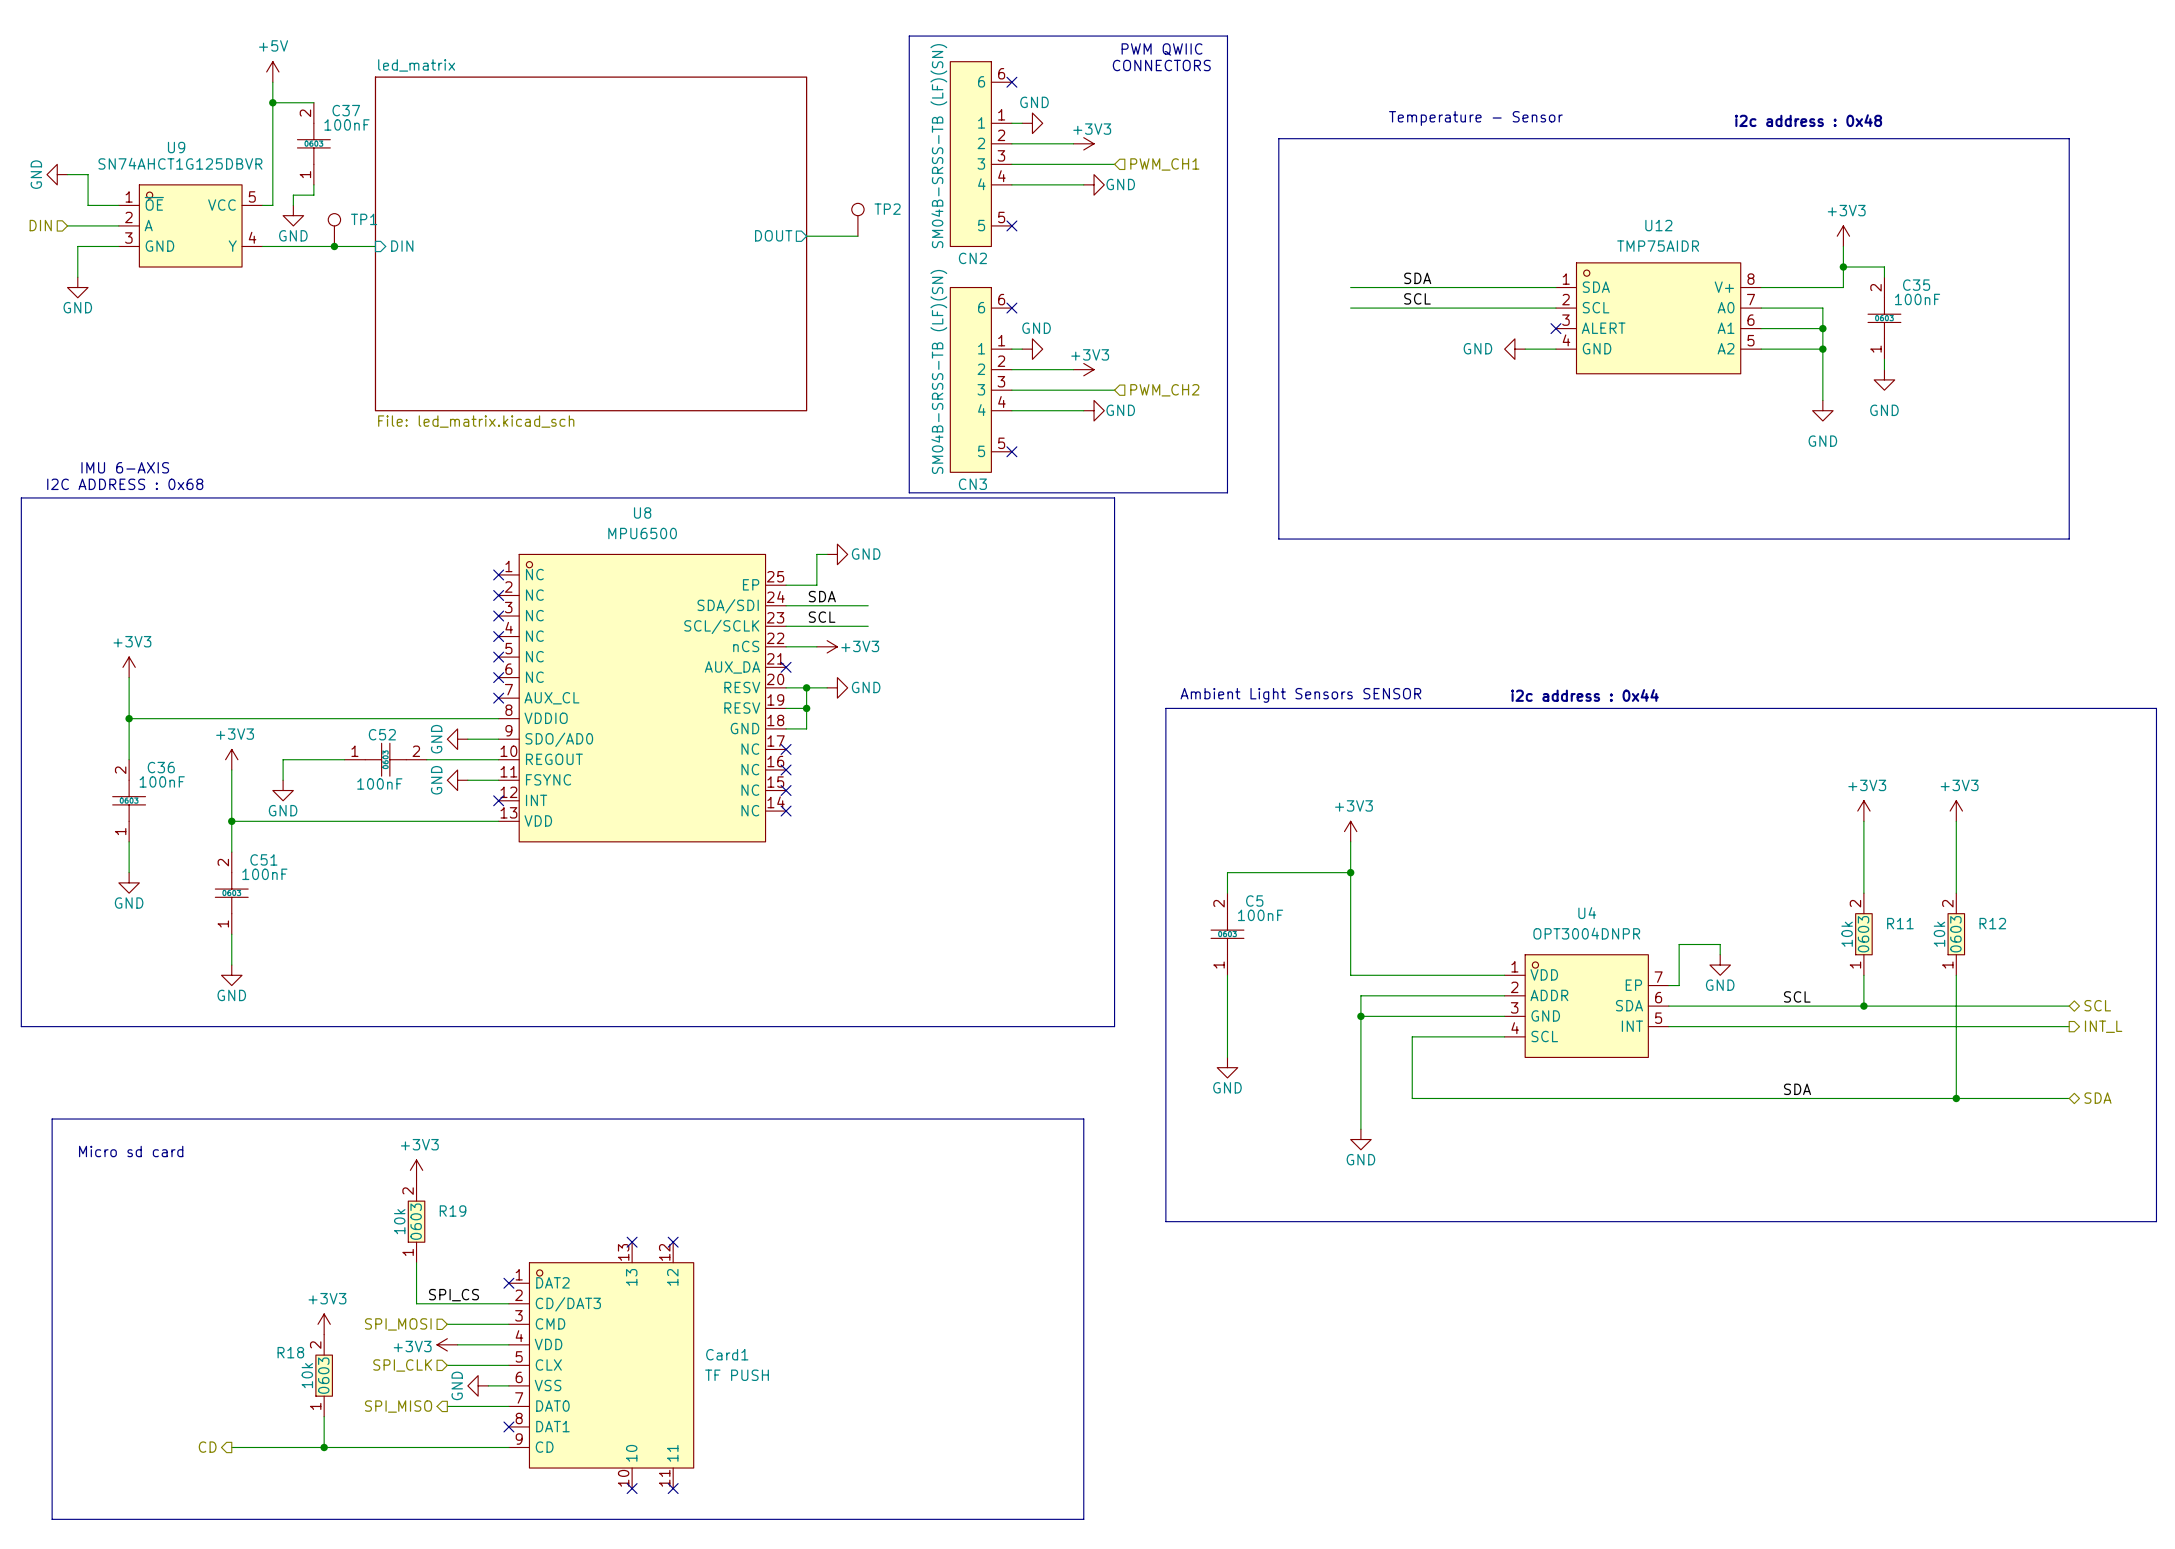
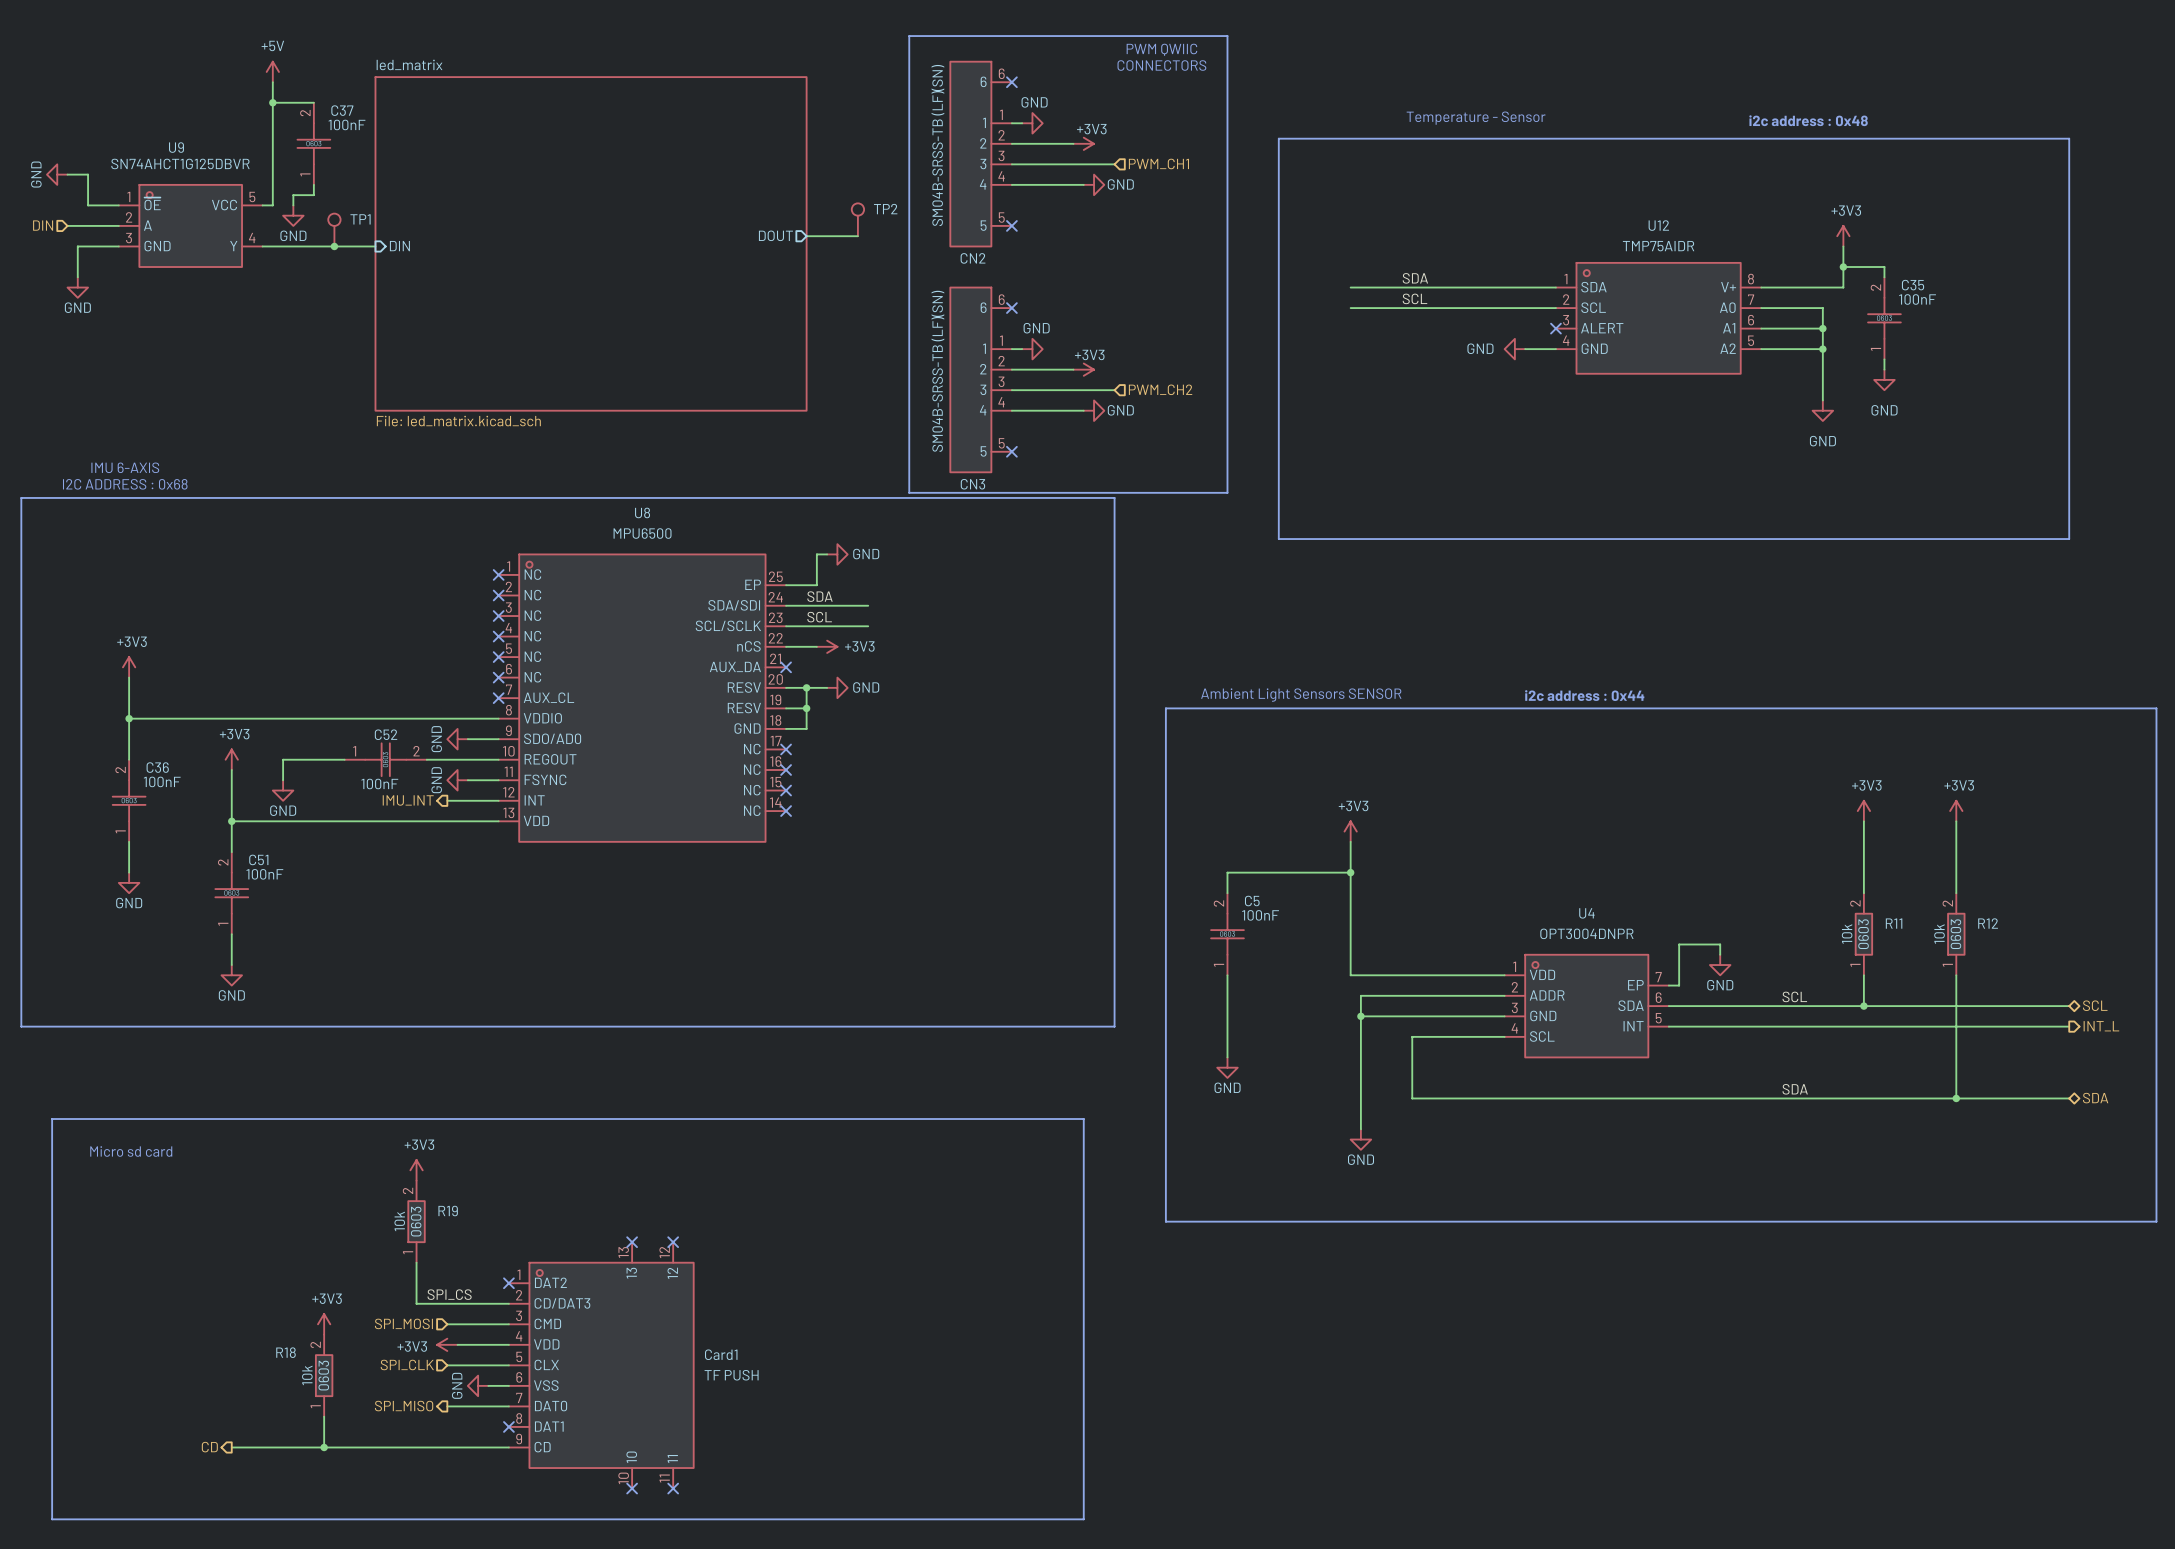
hierarchical label: none -> IMU_INT (408, 800)
wire: none -> (447, 800) (498, 800)
no-connect mark: (498, 800) -> none

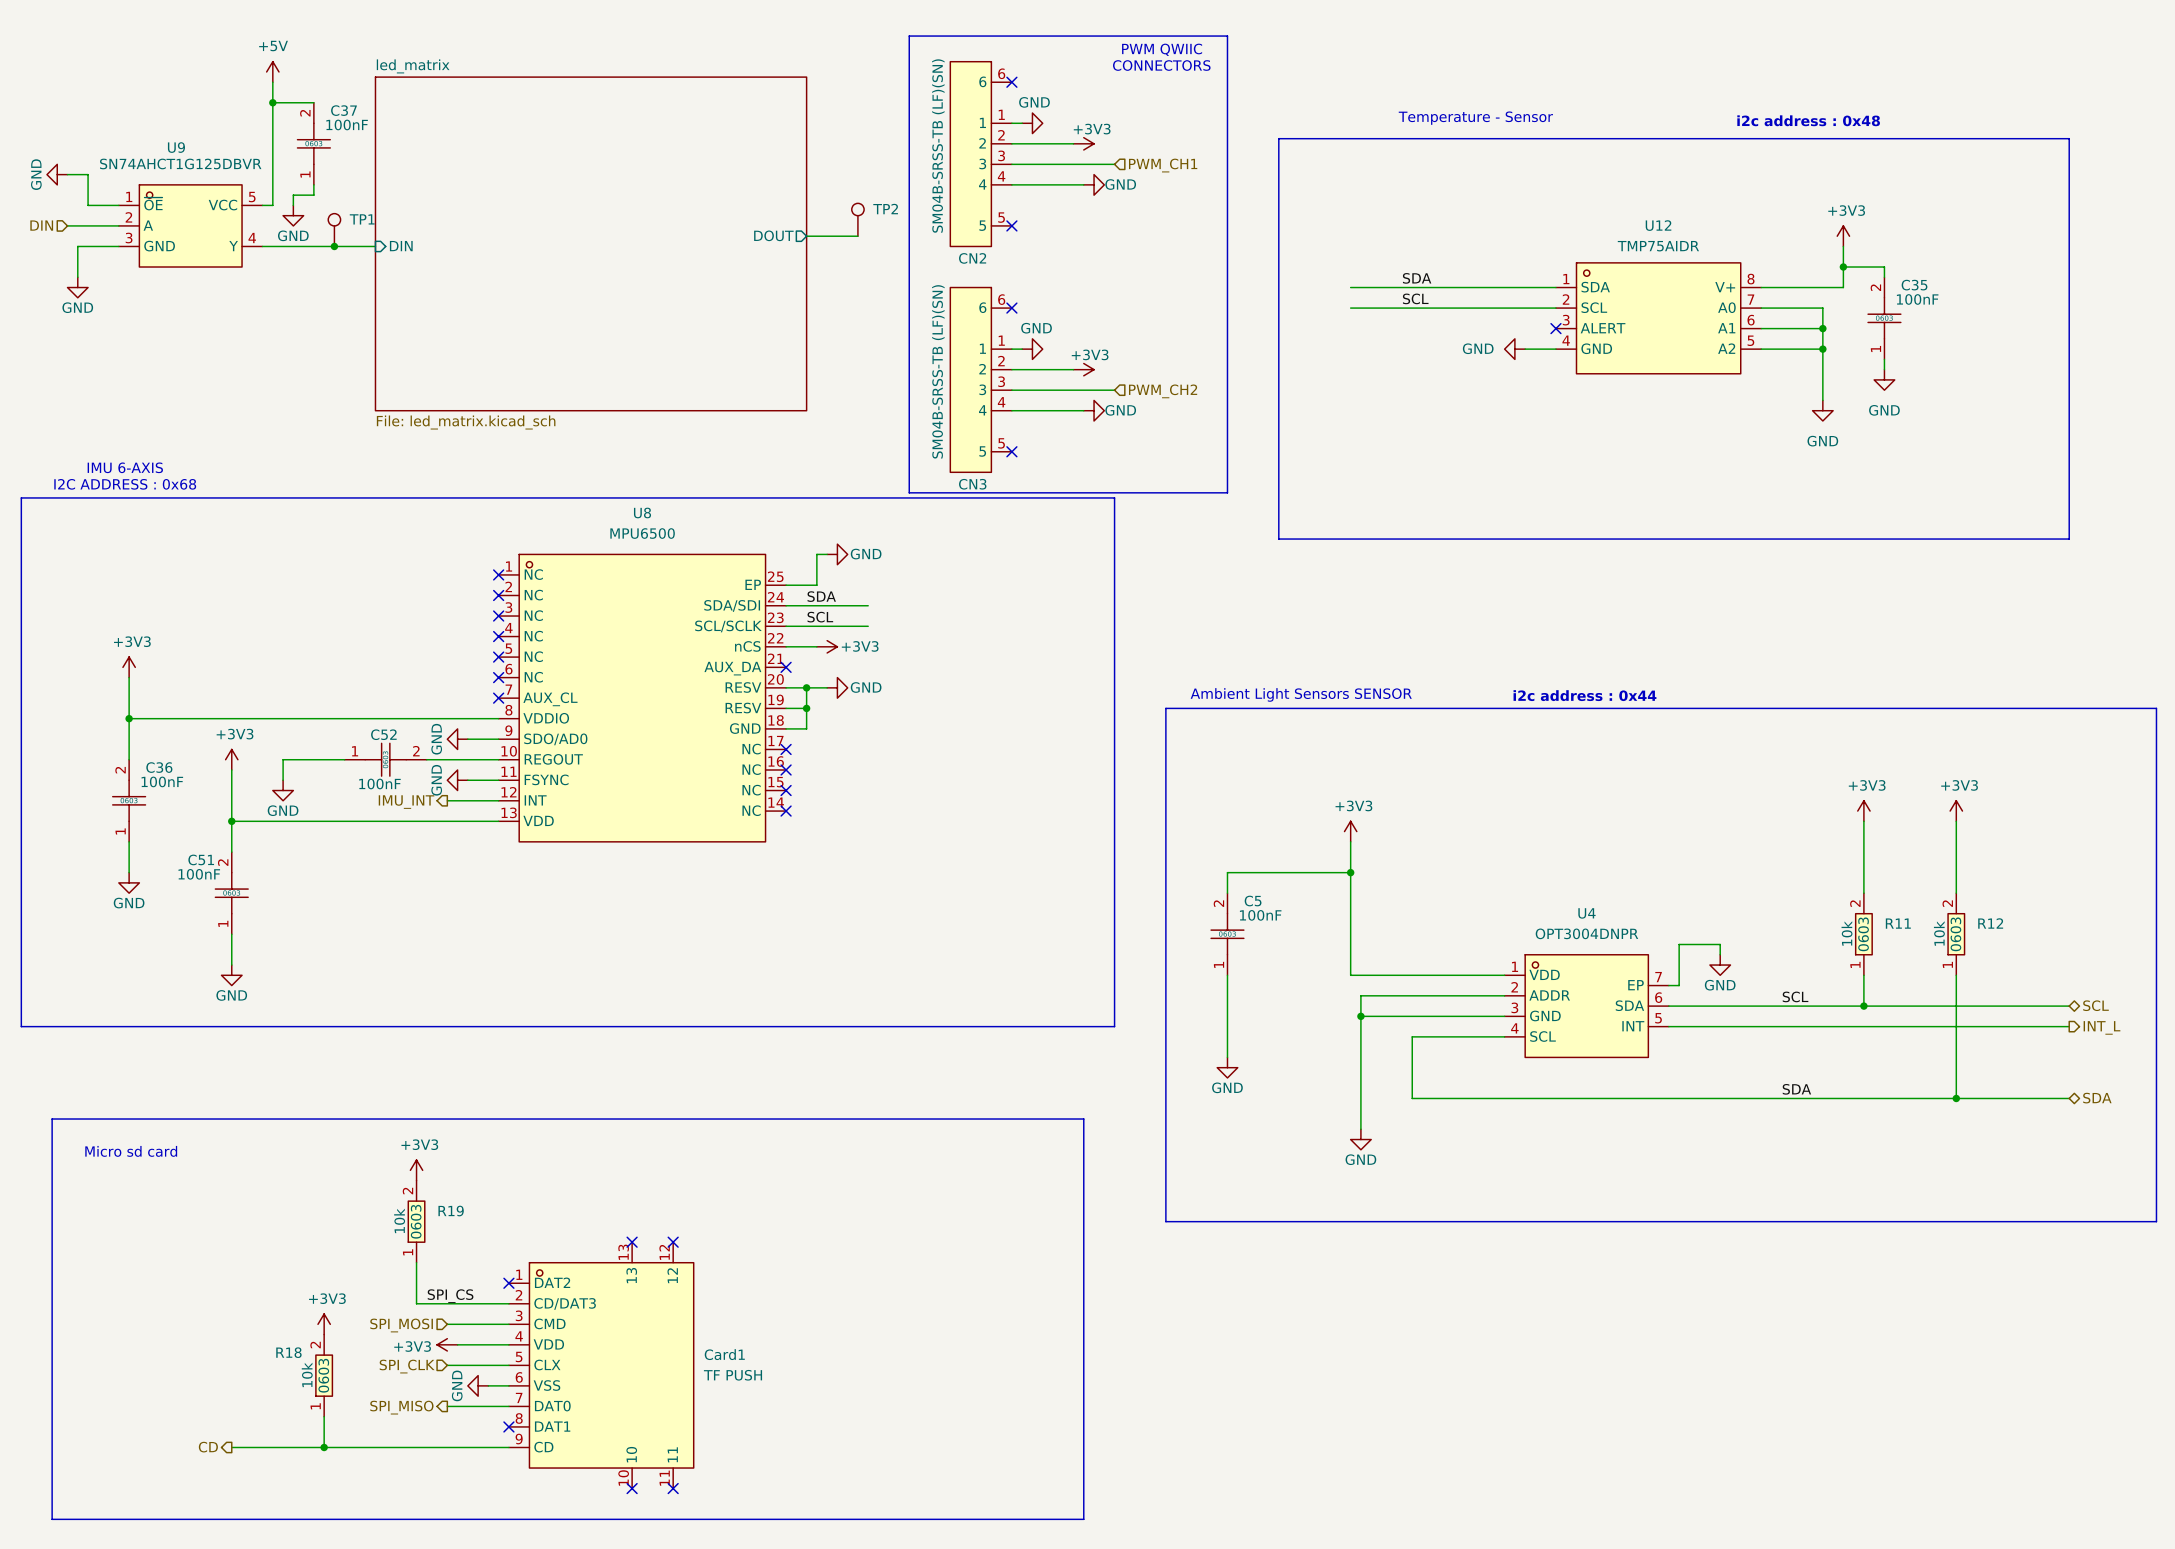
C51 name position: C51 (258, 859) -> C51 (201, 859)
C51 text position: 100nF (264, 874) -> 100nF (199, 874)

